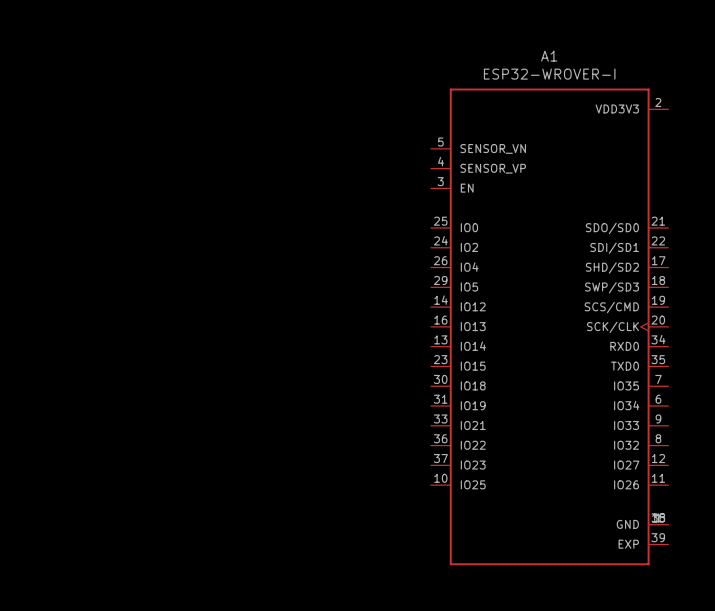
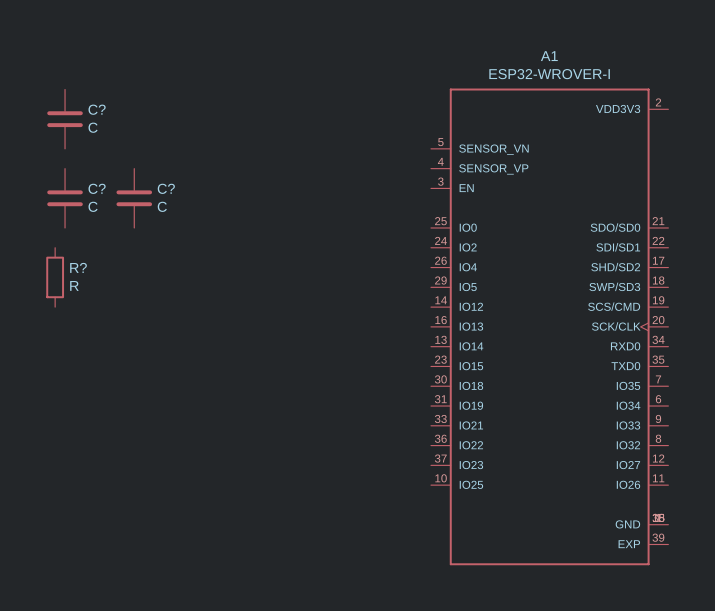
C?: none -> C (65, 119)
C?: none -> C (65, 198)
C?: none -> C (134, 198)
R?: none -> R (55, 277)

